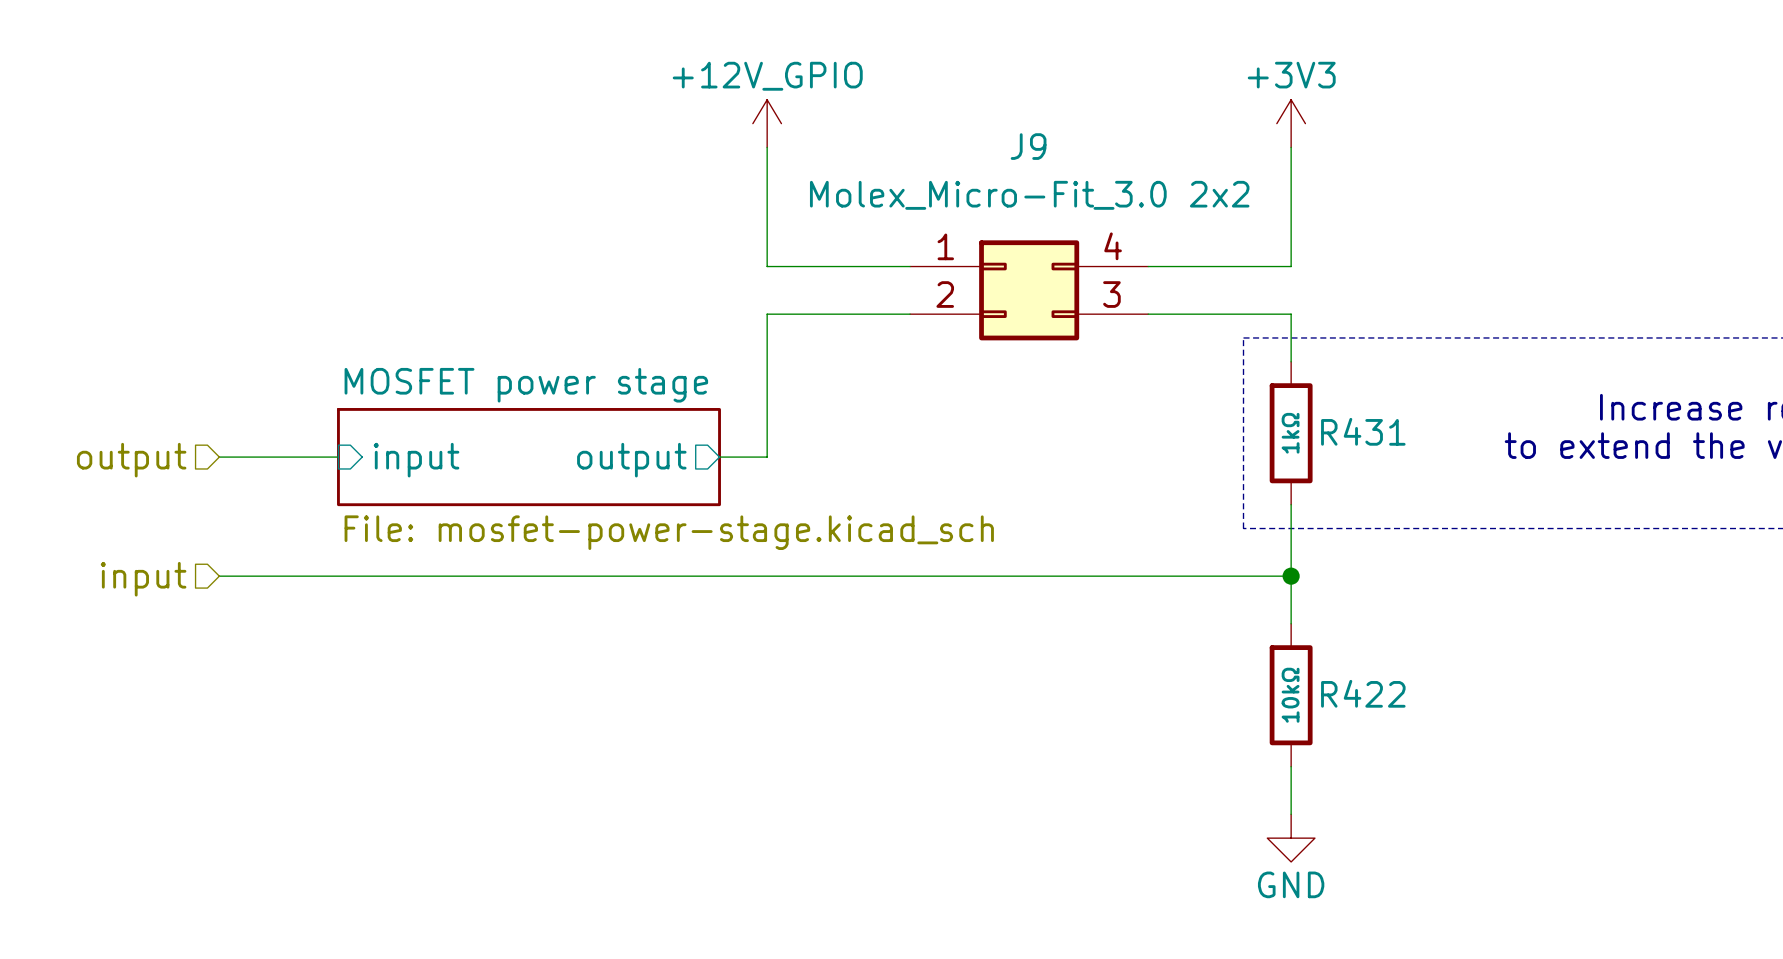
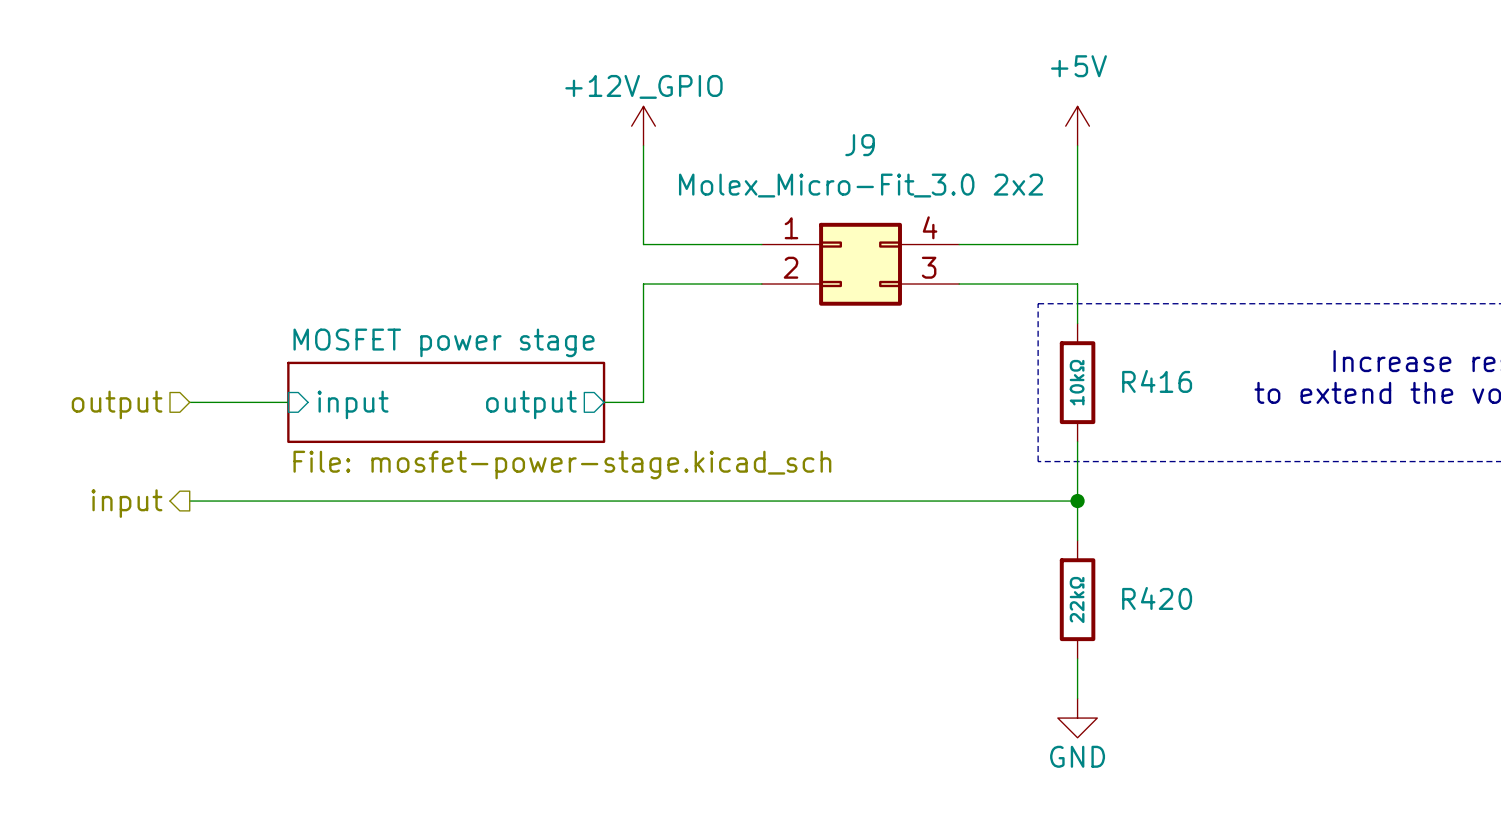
power symbol: +3V3 (1291, 123) -> +5V (1077, 126)
R431 name: R431 (1363, 431) -> R416 (1157, 381)
R431 value: 1kΩ (1290, 433) -> 10kΩ (1077, 382)
hierarchical label shape: input (143, 579) -> output (126, 503)
R422 name: R422 (1363, 693) -> R420 (1157, 598)
R422 value: 10kΩ (1290, 695) -> 22kΩ (1077, 599)

